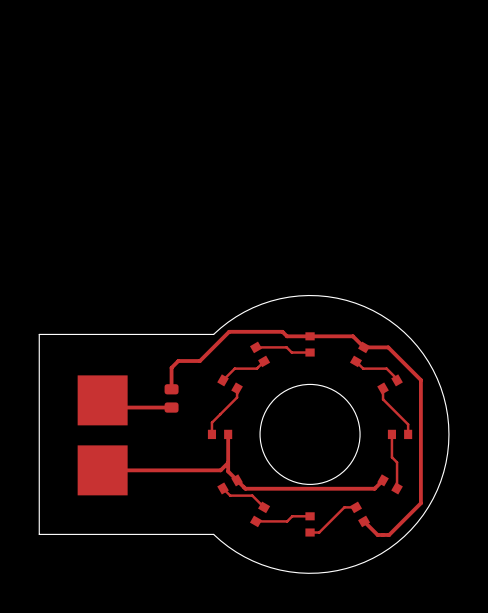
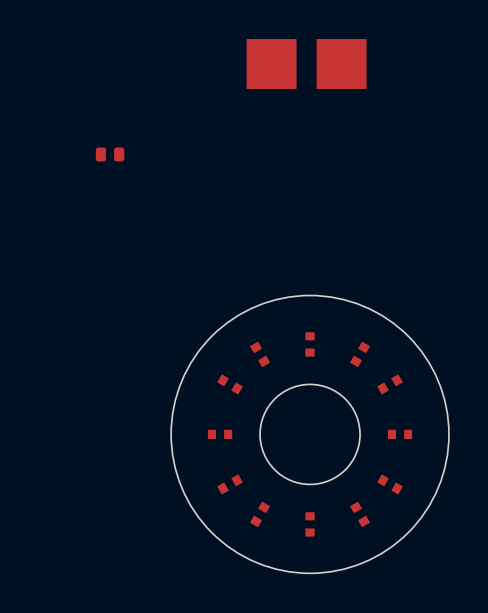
part: none -> (306, 64)
part: none -> (110, 154)
round board edge: none -> [170, 295, 450, 574]
board edge: (213, 334) (39, 334) (39, 534) (213, 534) (236, 552) (261, 564) (280, 570) (308, 573) (327, 572) (355, 565) (381, 553) (404, 536) (423, 515) (437, 490) (446, 462) (448, 434) (447, 415) (440, 387) (428, 361) (411, 339) (397, 326) (373, 310) (346, 300) (318, 295) (289, 297) (261, 304) (236, 316) (213, 334) -> none
top track: (256, 347) (286, 347) (291, 352) (310, 352) -> none
top track: (264, 361) (256, 368) (234, 368) (223, 380) -> none
top track: (355, 361) (363, 368) (386, 368) (397, 380) -> none
top track: (237, 388) (237, 397) (211, 422) (211, 434) -> none
top track: (383, 388) (383, 399) (408, 424) (408, 434) -> none
top track: (171, 389) (171, 367) (178, 361) (199, 361) (229, 331) (282, 331) (287, 336) (353, 336) (364, 347) (388, 347) (420, 380) (420, 503) (389, 534) (377, 534) (364, 521) -> none
part: (171, 398) -> none
top track: (102, 400) (109, 407) (171, 407) -> none
top track: (228, 434) (228, 471) (245, 488) (374, 488) (383, 480) -> none
top track: (391, 434) (391, 457) (397, 462) (397, 488) -> none
part: (102, 435) -> none
top track: (228, 462) (220, 470) (102, 470) -> none
top track: (223, 488) (230, 495) (252, 495) (264, 507) -> none
top track: (355, 507) (344, 507) (319, 532) (310, 532) -> none
top track: (310, 516) (292, 516) (287, 521) (256, 521) -> none

